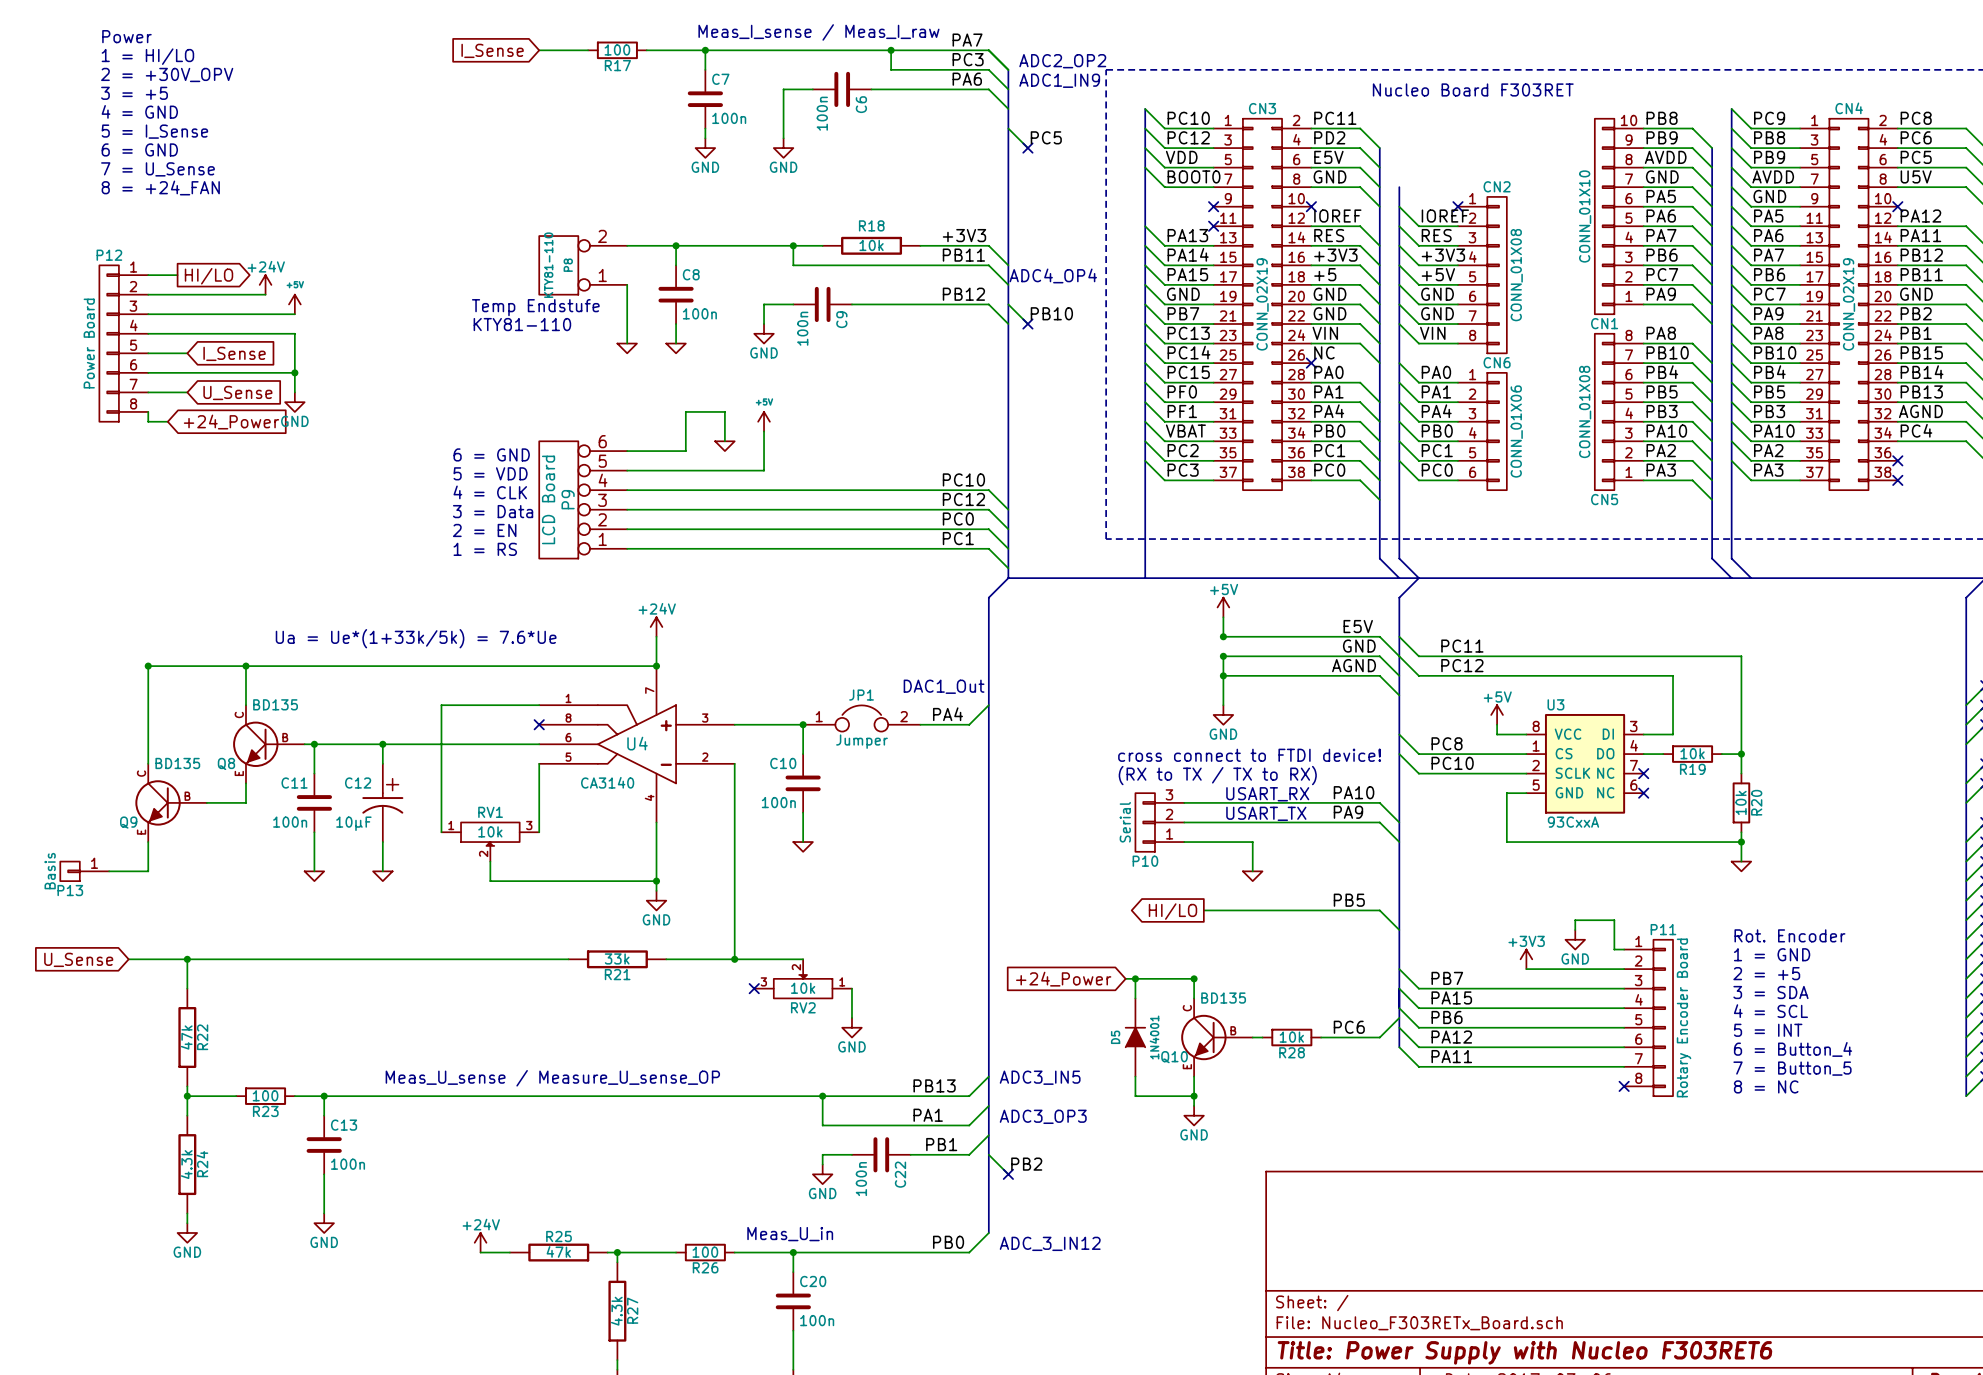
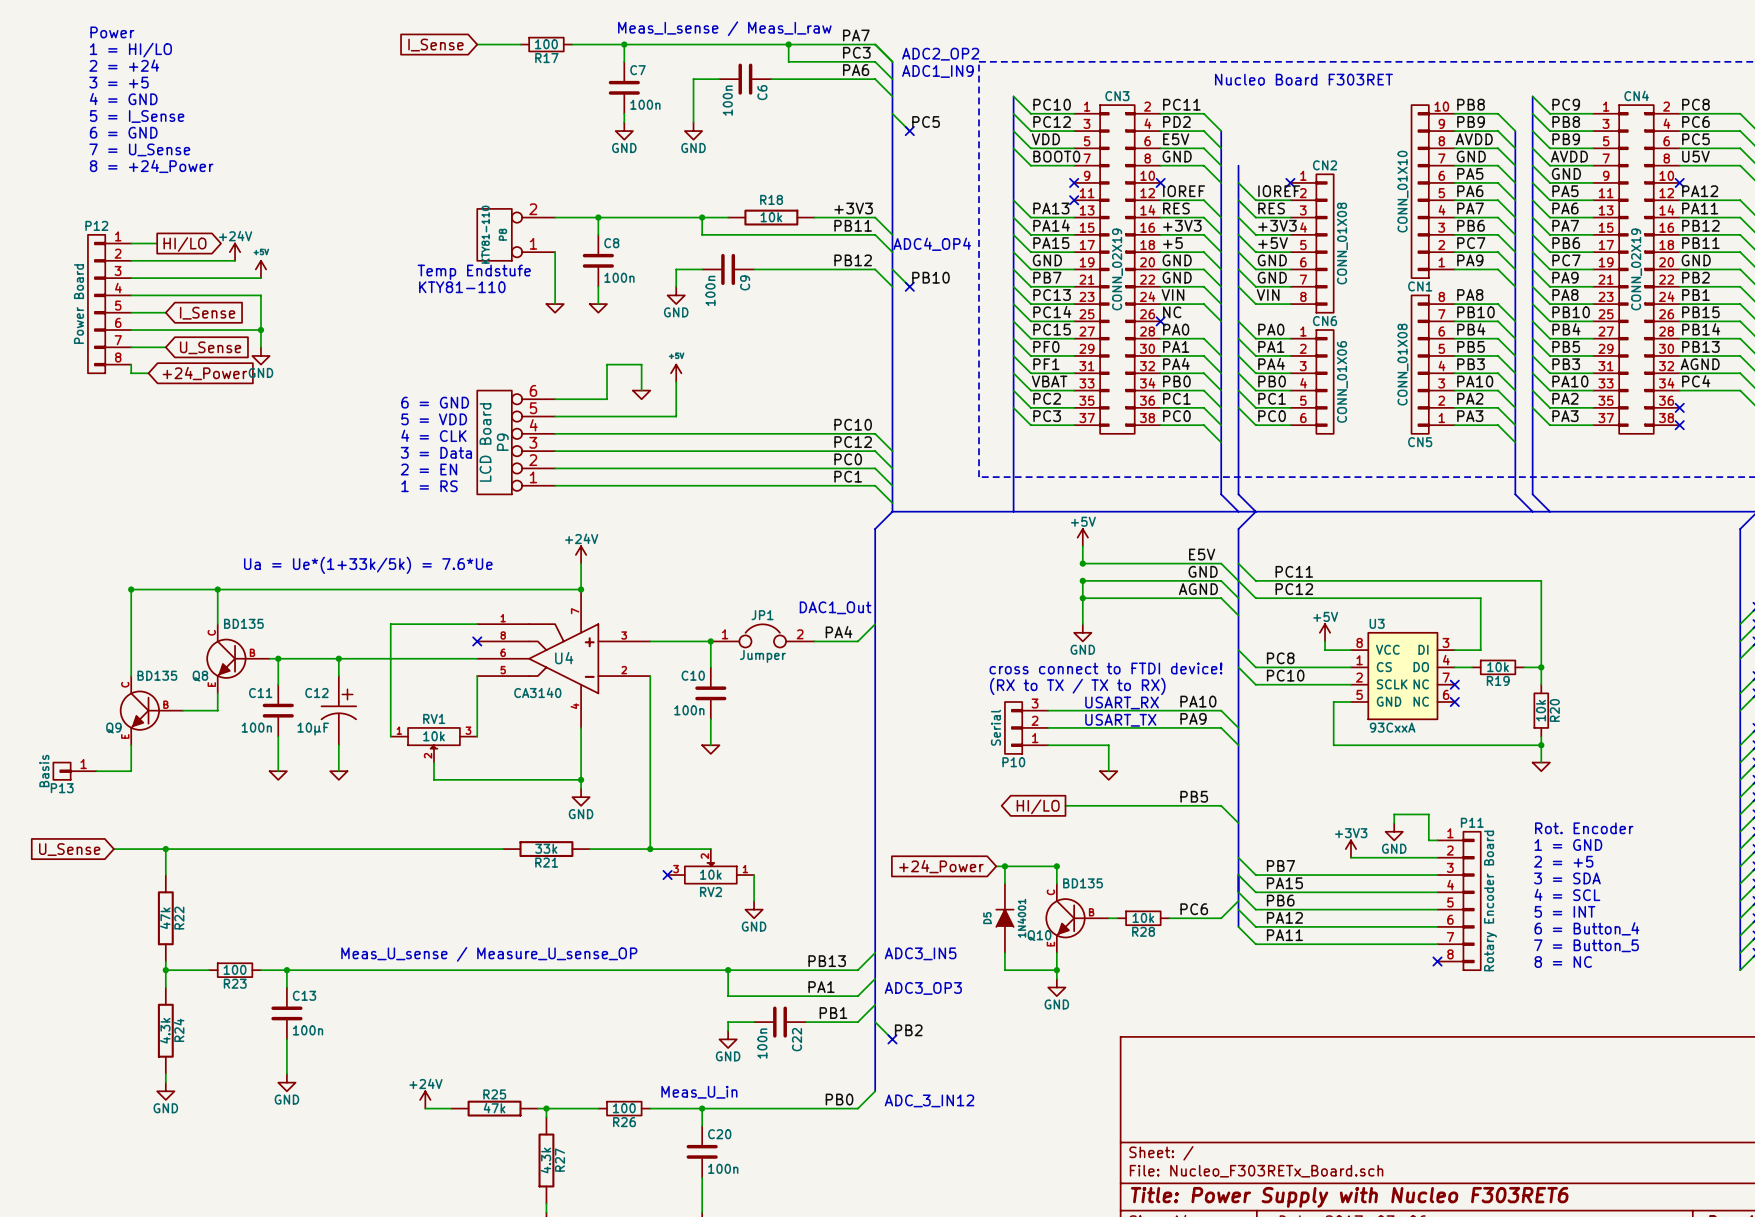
text: 2 = +30V_OPV (167, 74) -> 2 = +24 (124, 65)
text: 8 = +24_FAN (160, 187) -> 8 = +24_Power (151, 166)

